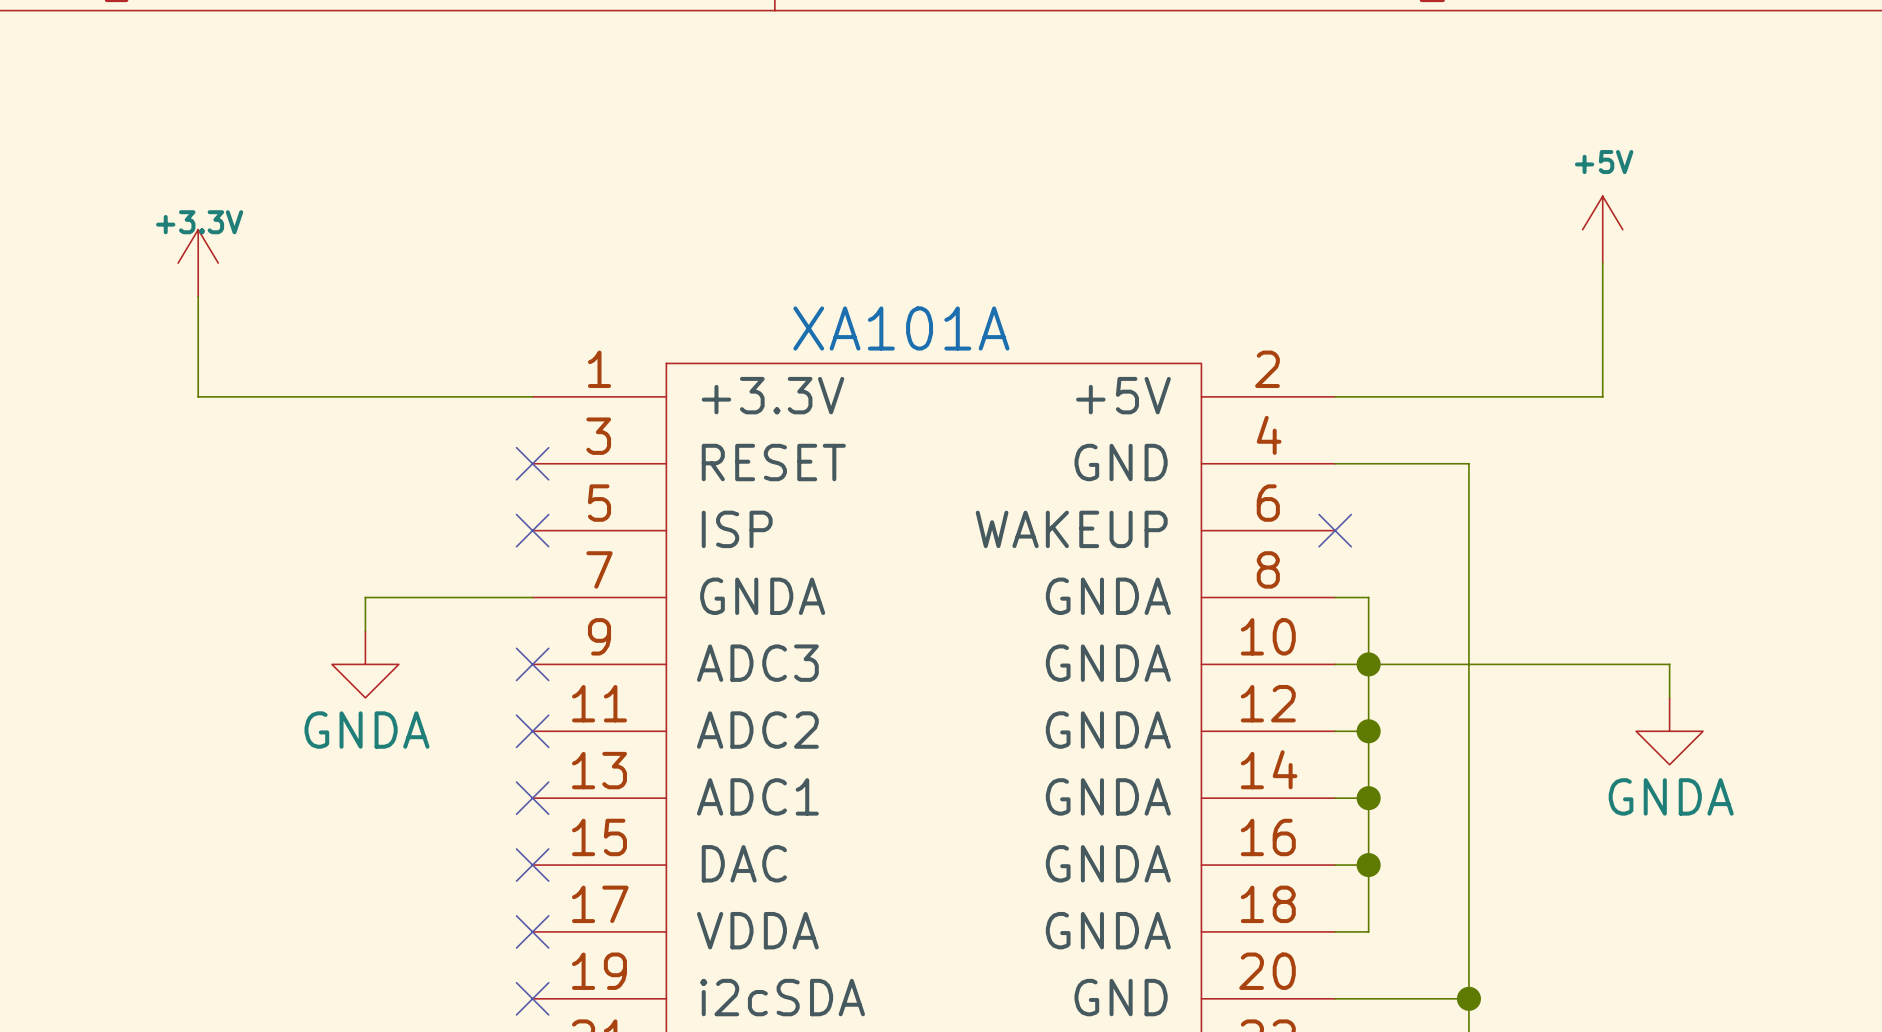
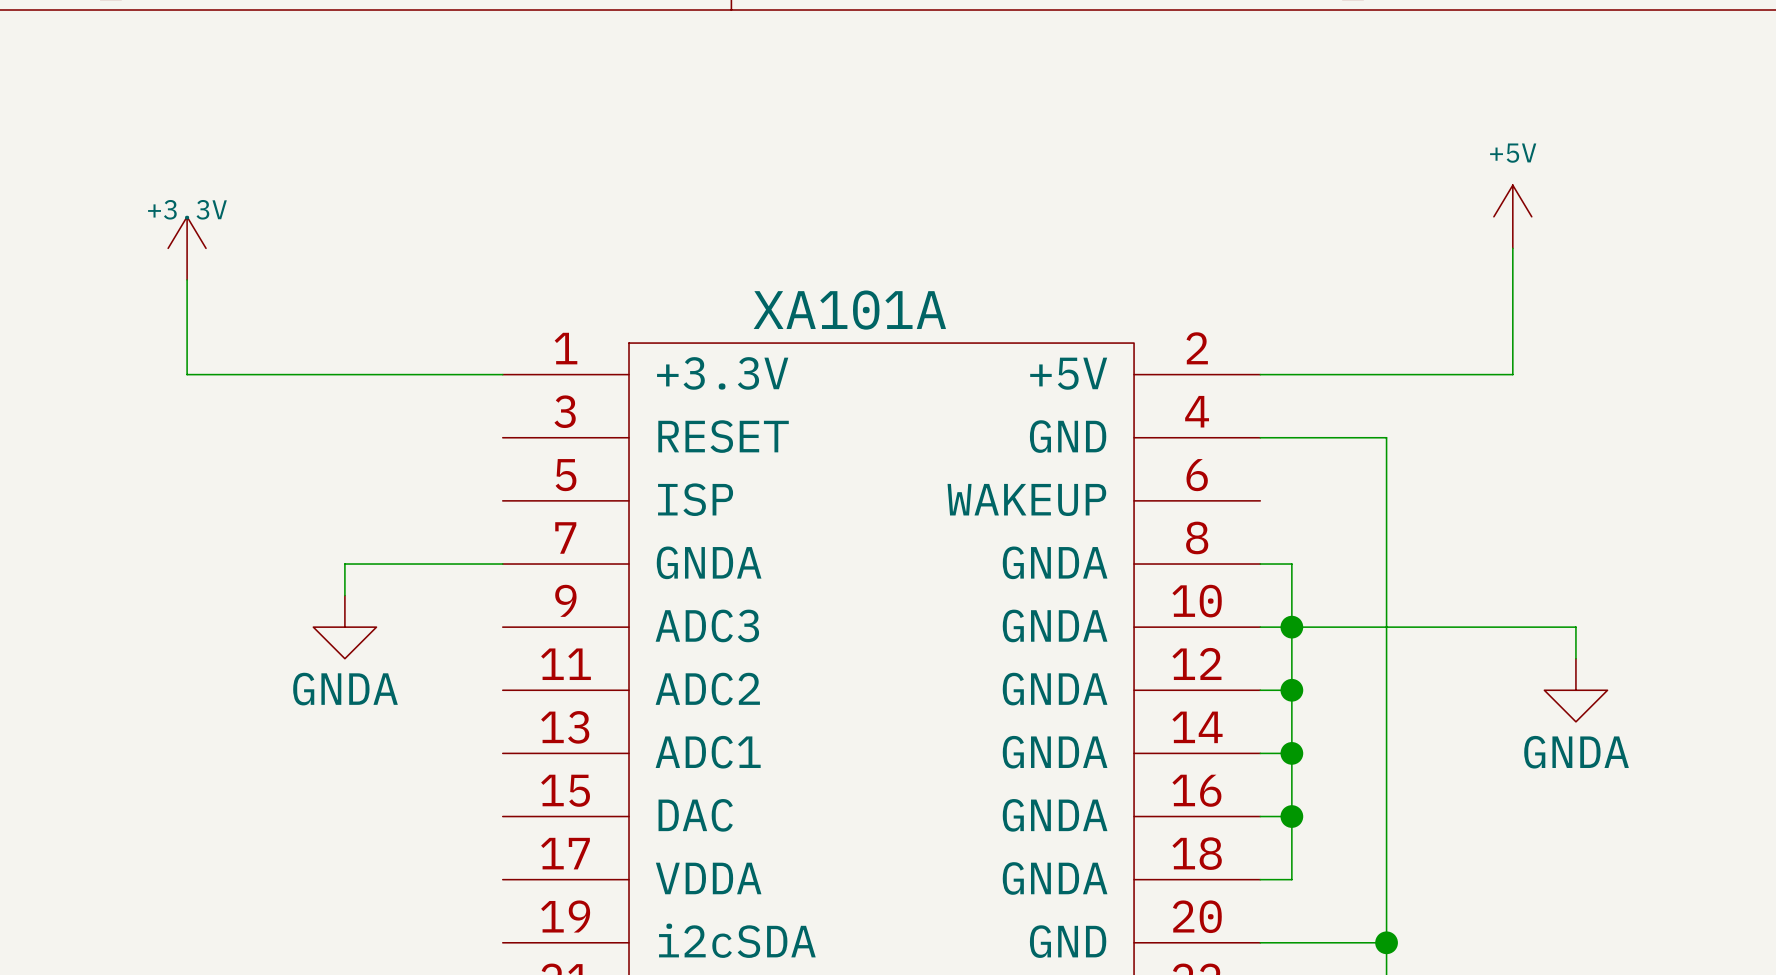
no-connect mark: (532, 463) -> none
no-connect mark: (532, 530) -> none
no-connect mark: (1335, 530) -> none
no-connect mark: (532, 664) -> none
no-connect mark: (532, 731) -> none
no-connect mark: (532, 798) -> none
no-connect mark: (532, 865) -> none
no-connect mark: (532, 931) -> none
no-connect mark: (532, 998) -> none

